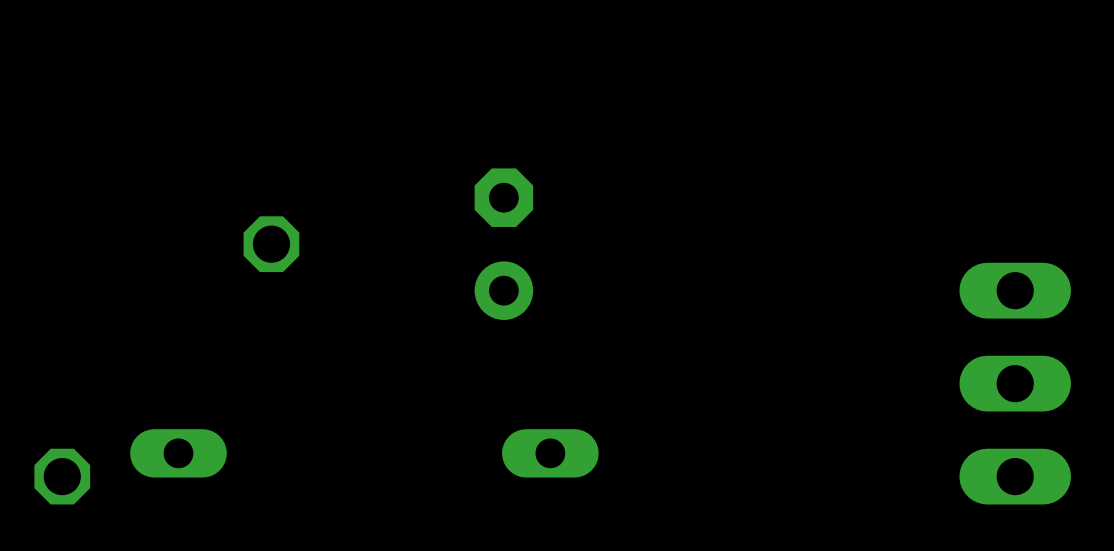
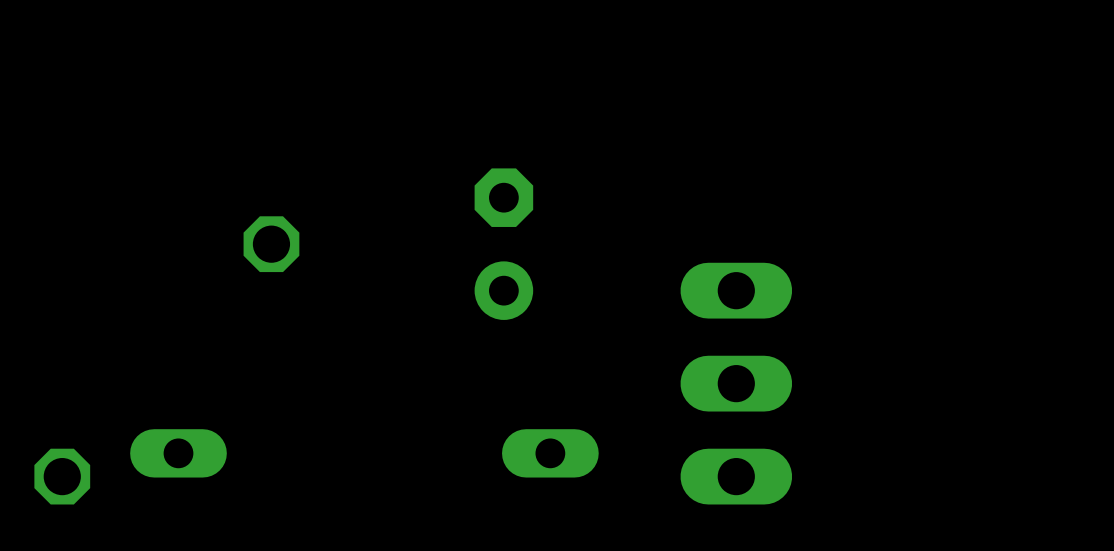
part position: (1015, 383) -> (736, 383)

